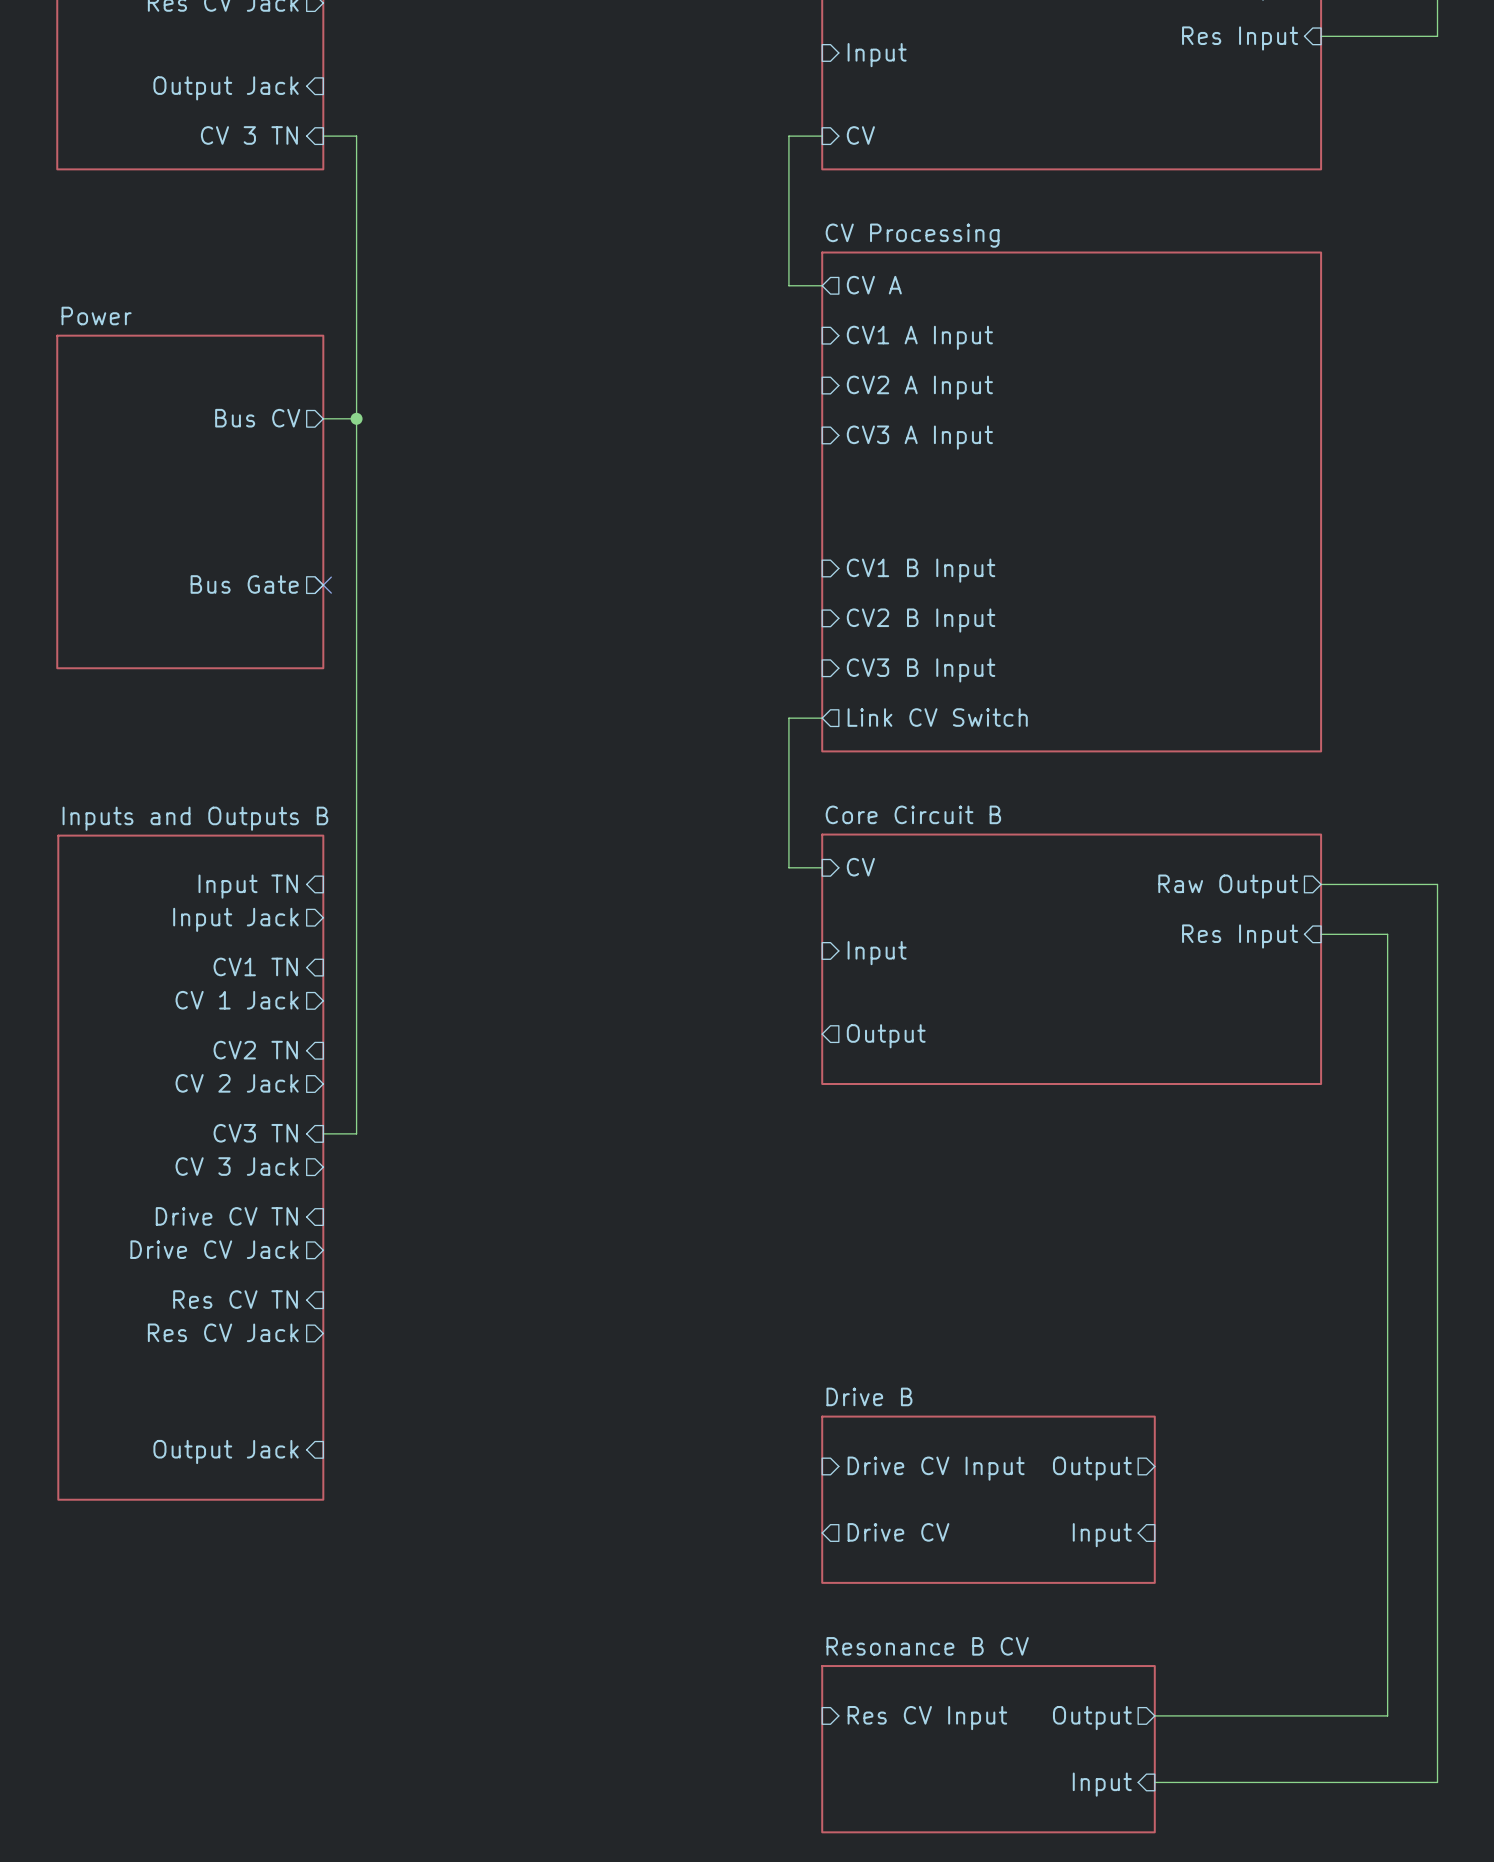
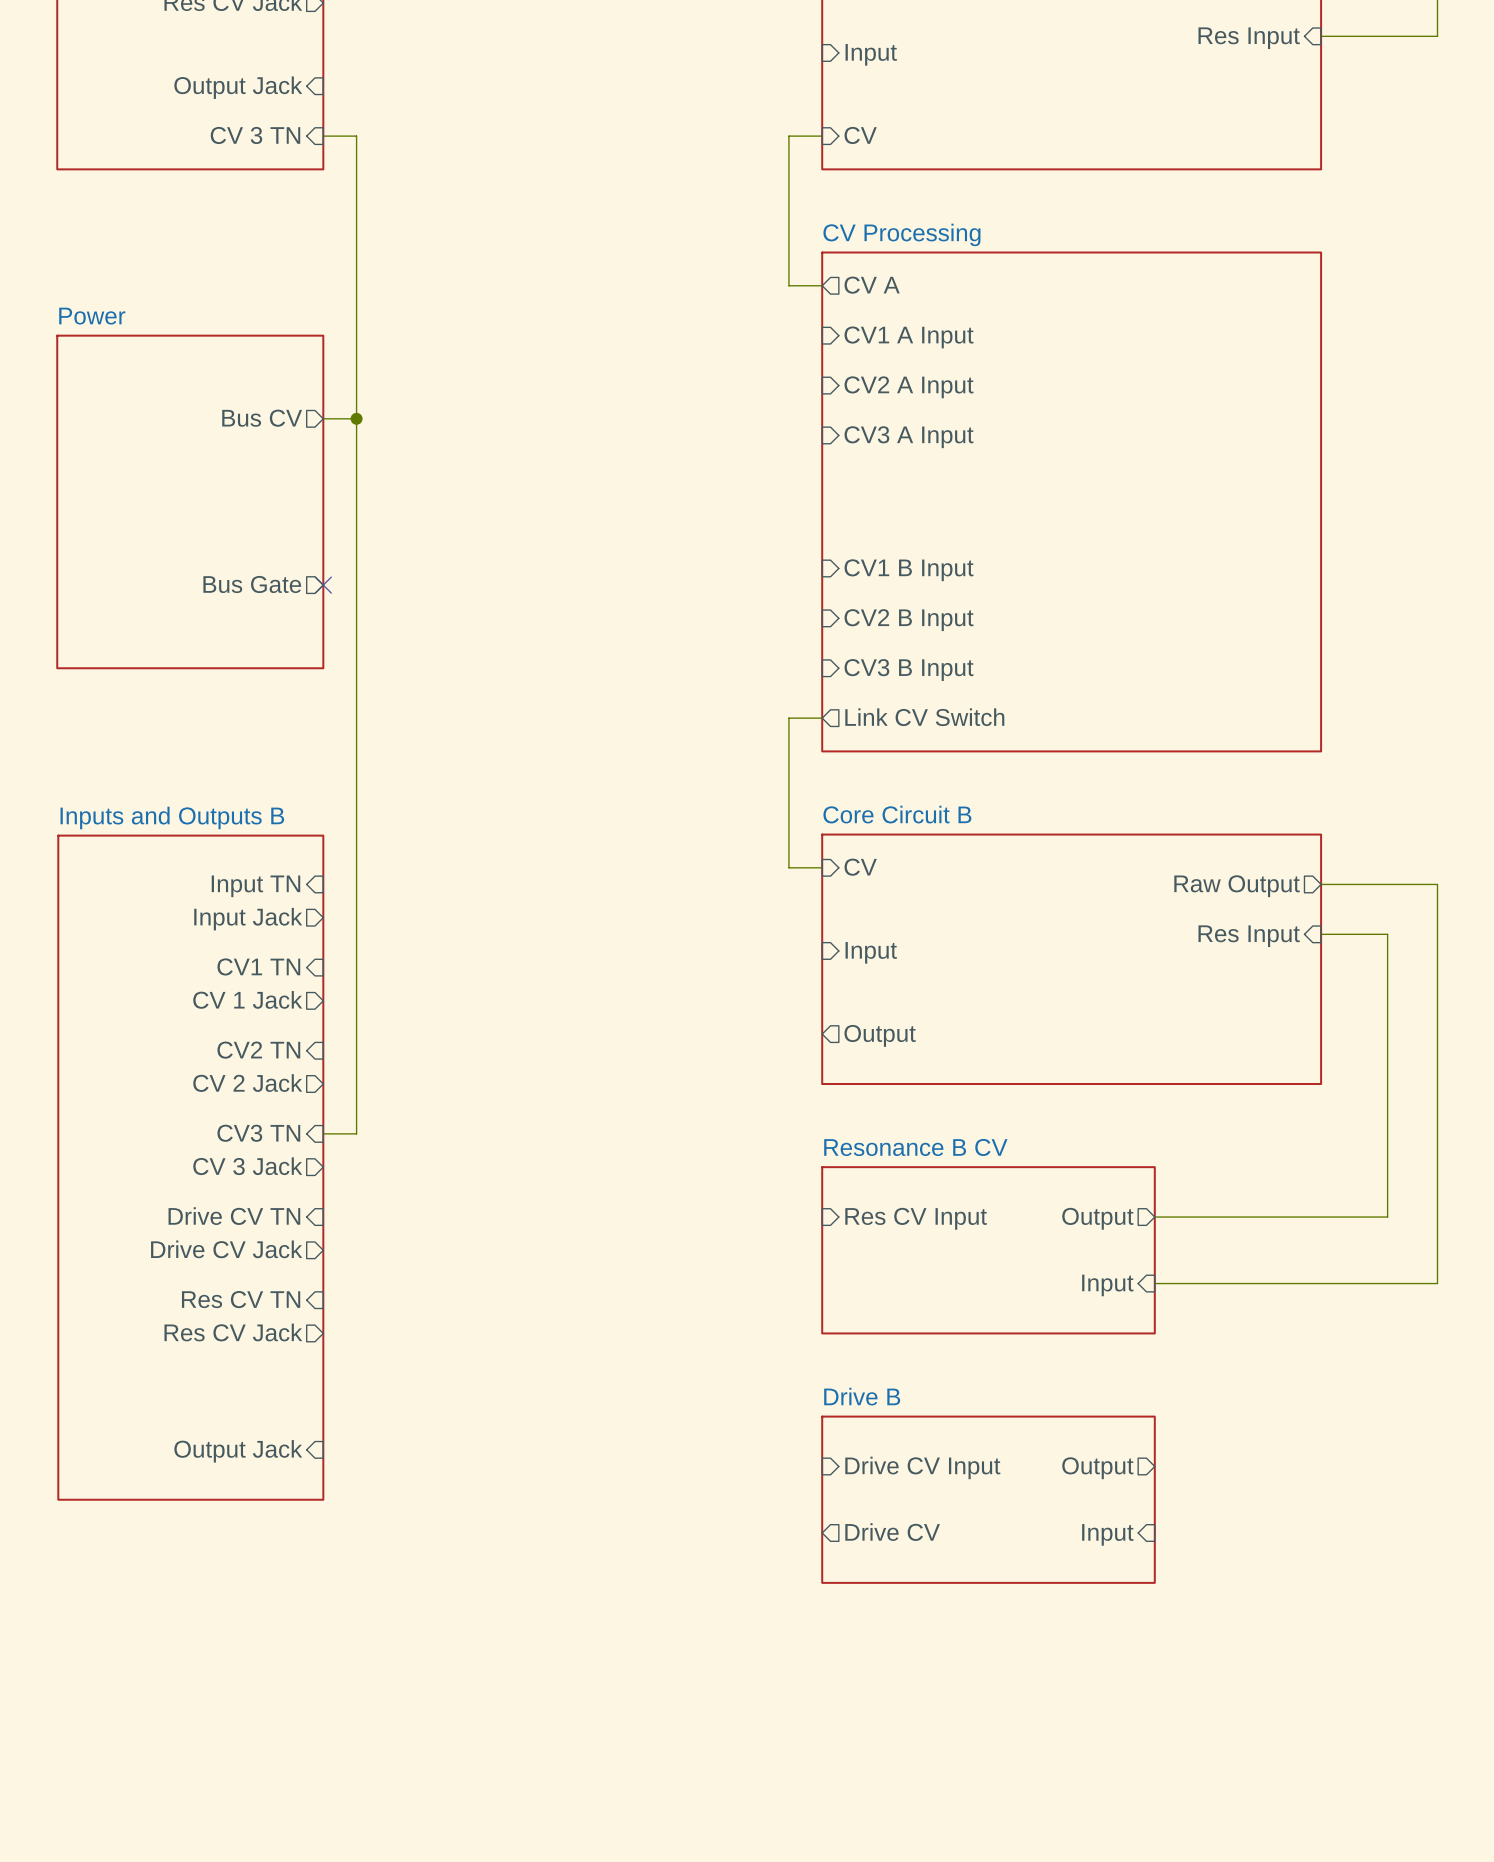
wire: (1387, 1217) (1387, 1715) (1154, 1715) -> (1387, 1217) (1154, 1217)
sheet pin: none -> Res CV Input (916, 1218)
sheet pin: none -> Output (1097, 1218)
sheet Resonance B CV: none -> (988, 1250)
wire: (1437, 1283) (1437, 1782) (1154, 1782) -> (1437, 1283) (1154, 1283)
sheet pin: none -> Input (1107, 1285)
sheet pin: Res CV Input (927, 1718) -> none
sheet pin: Output (1092, 1718) -> none
sheet Resonance B CV: (988, 1749) -> none
sheet pin: Input (1102, 1784) -> none

